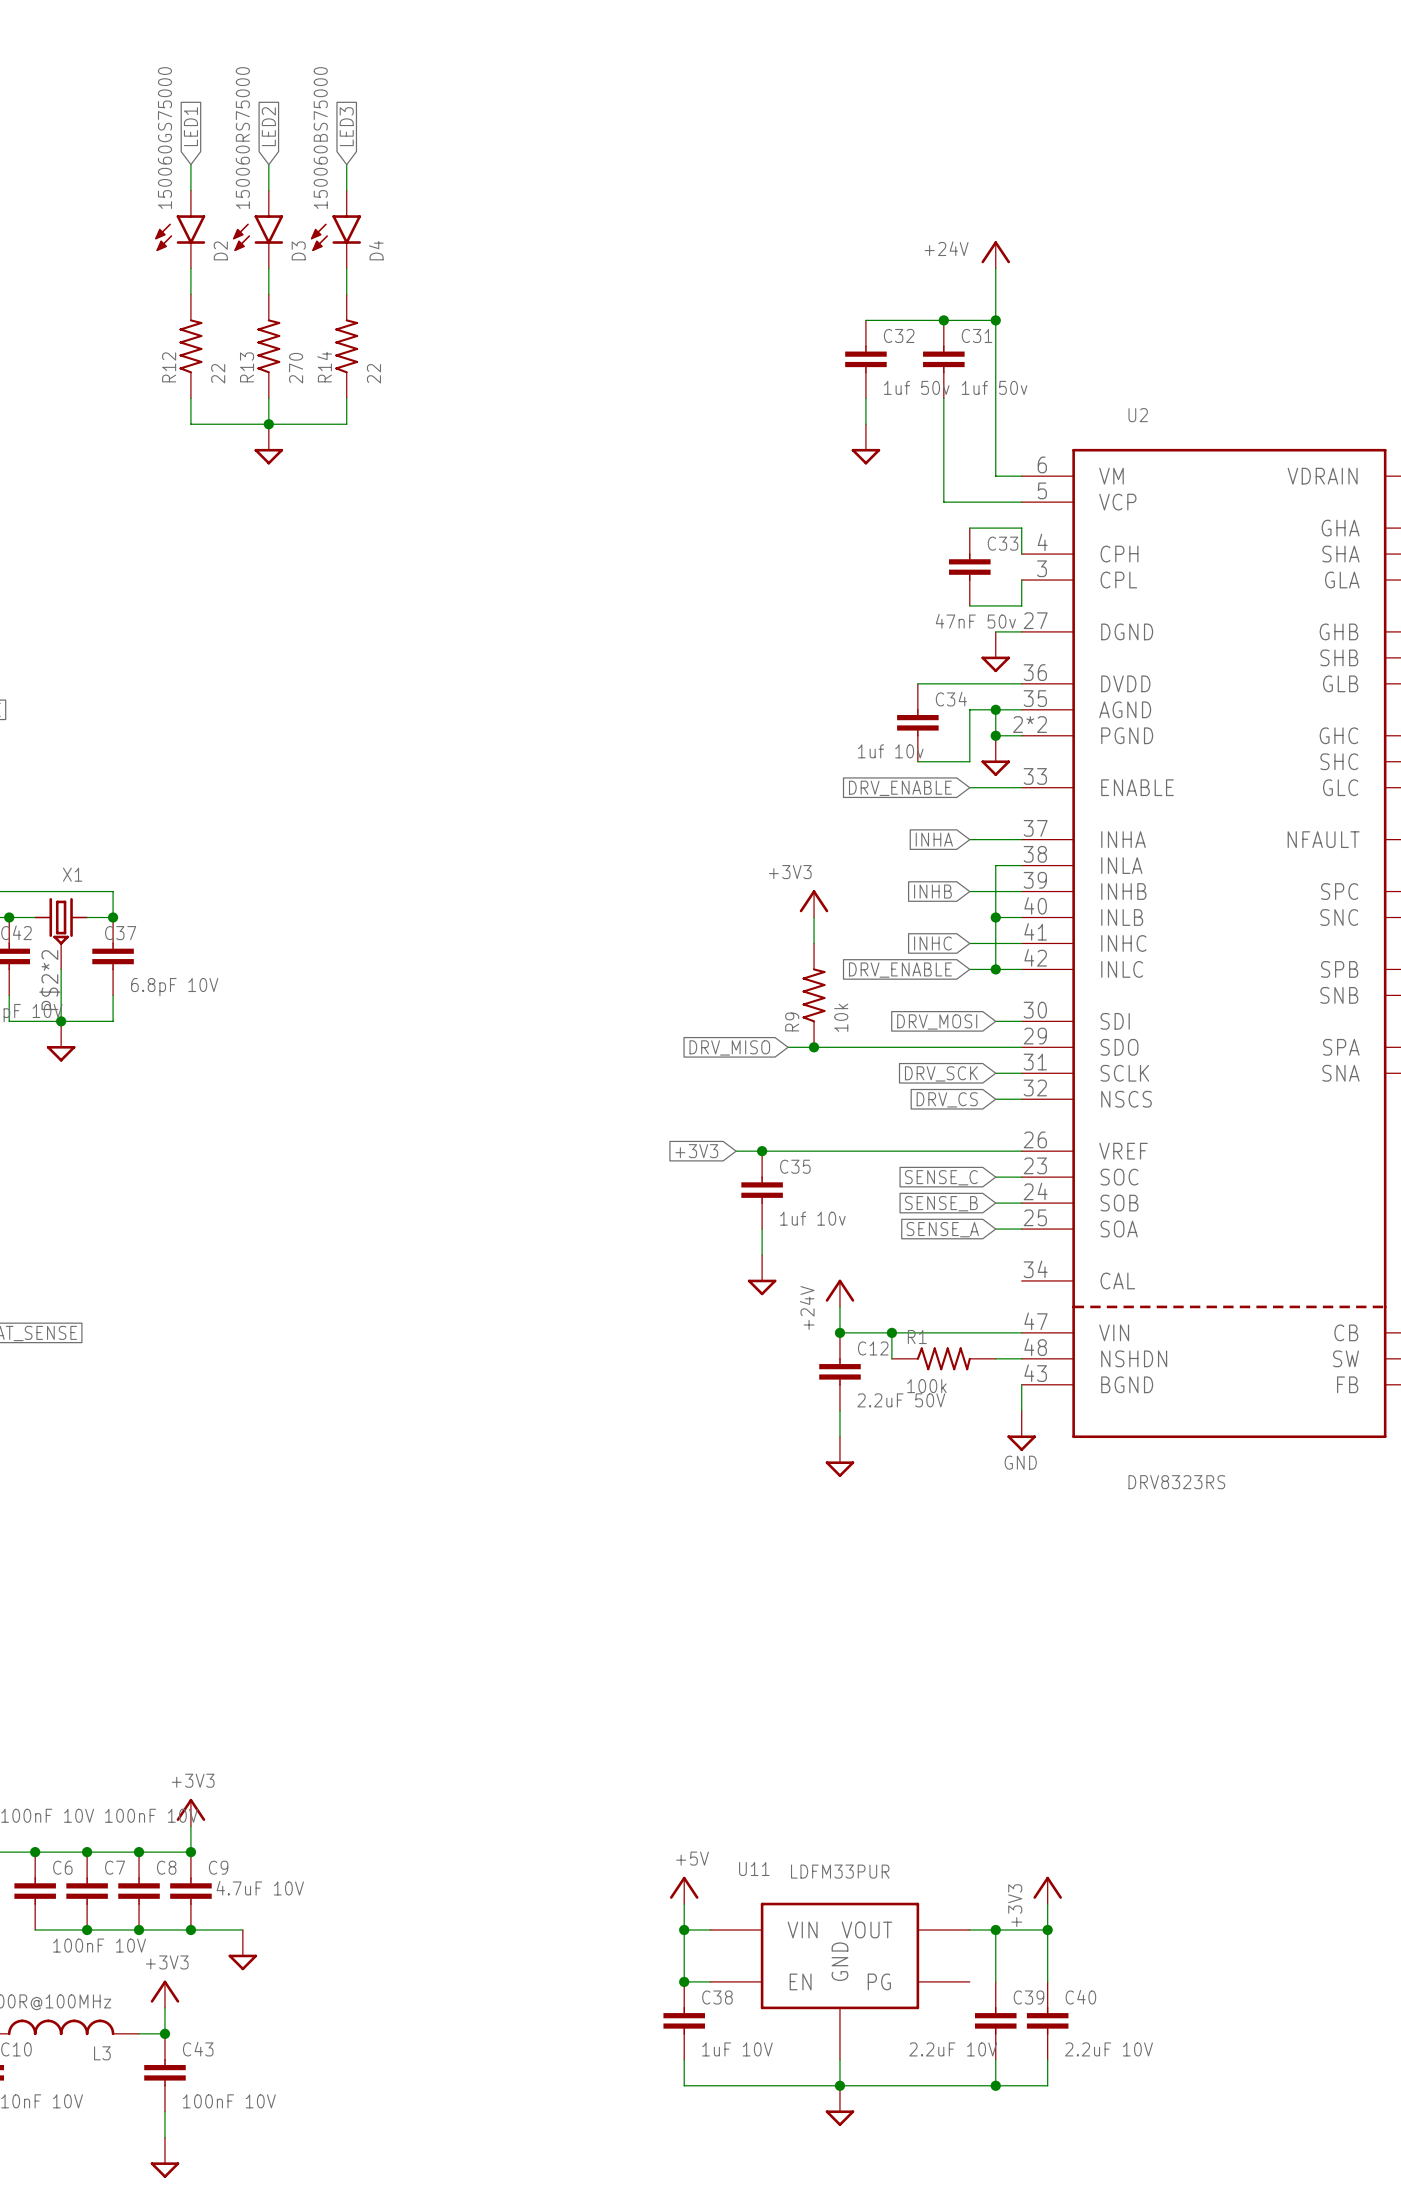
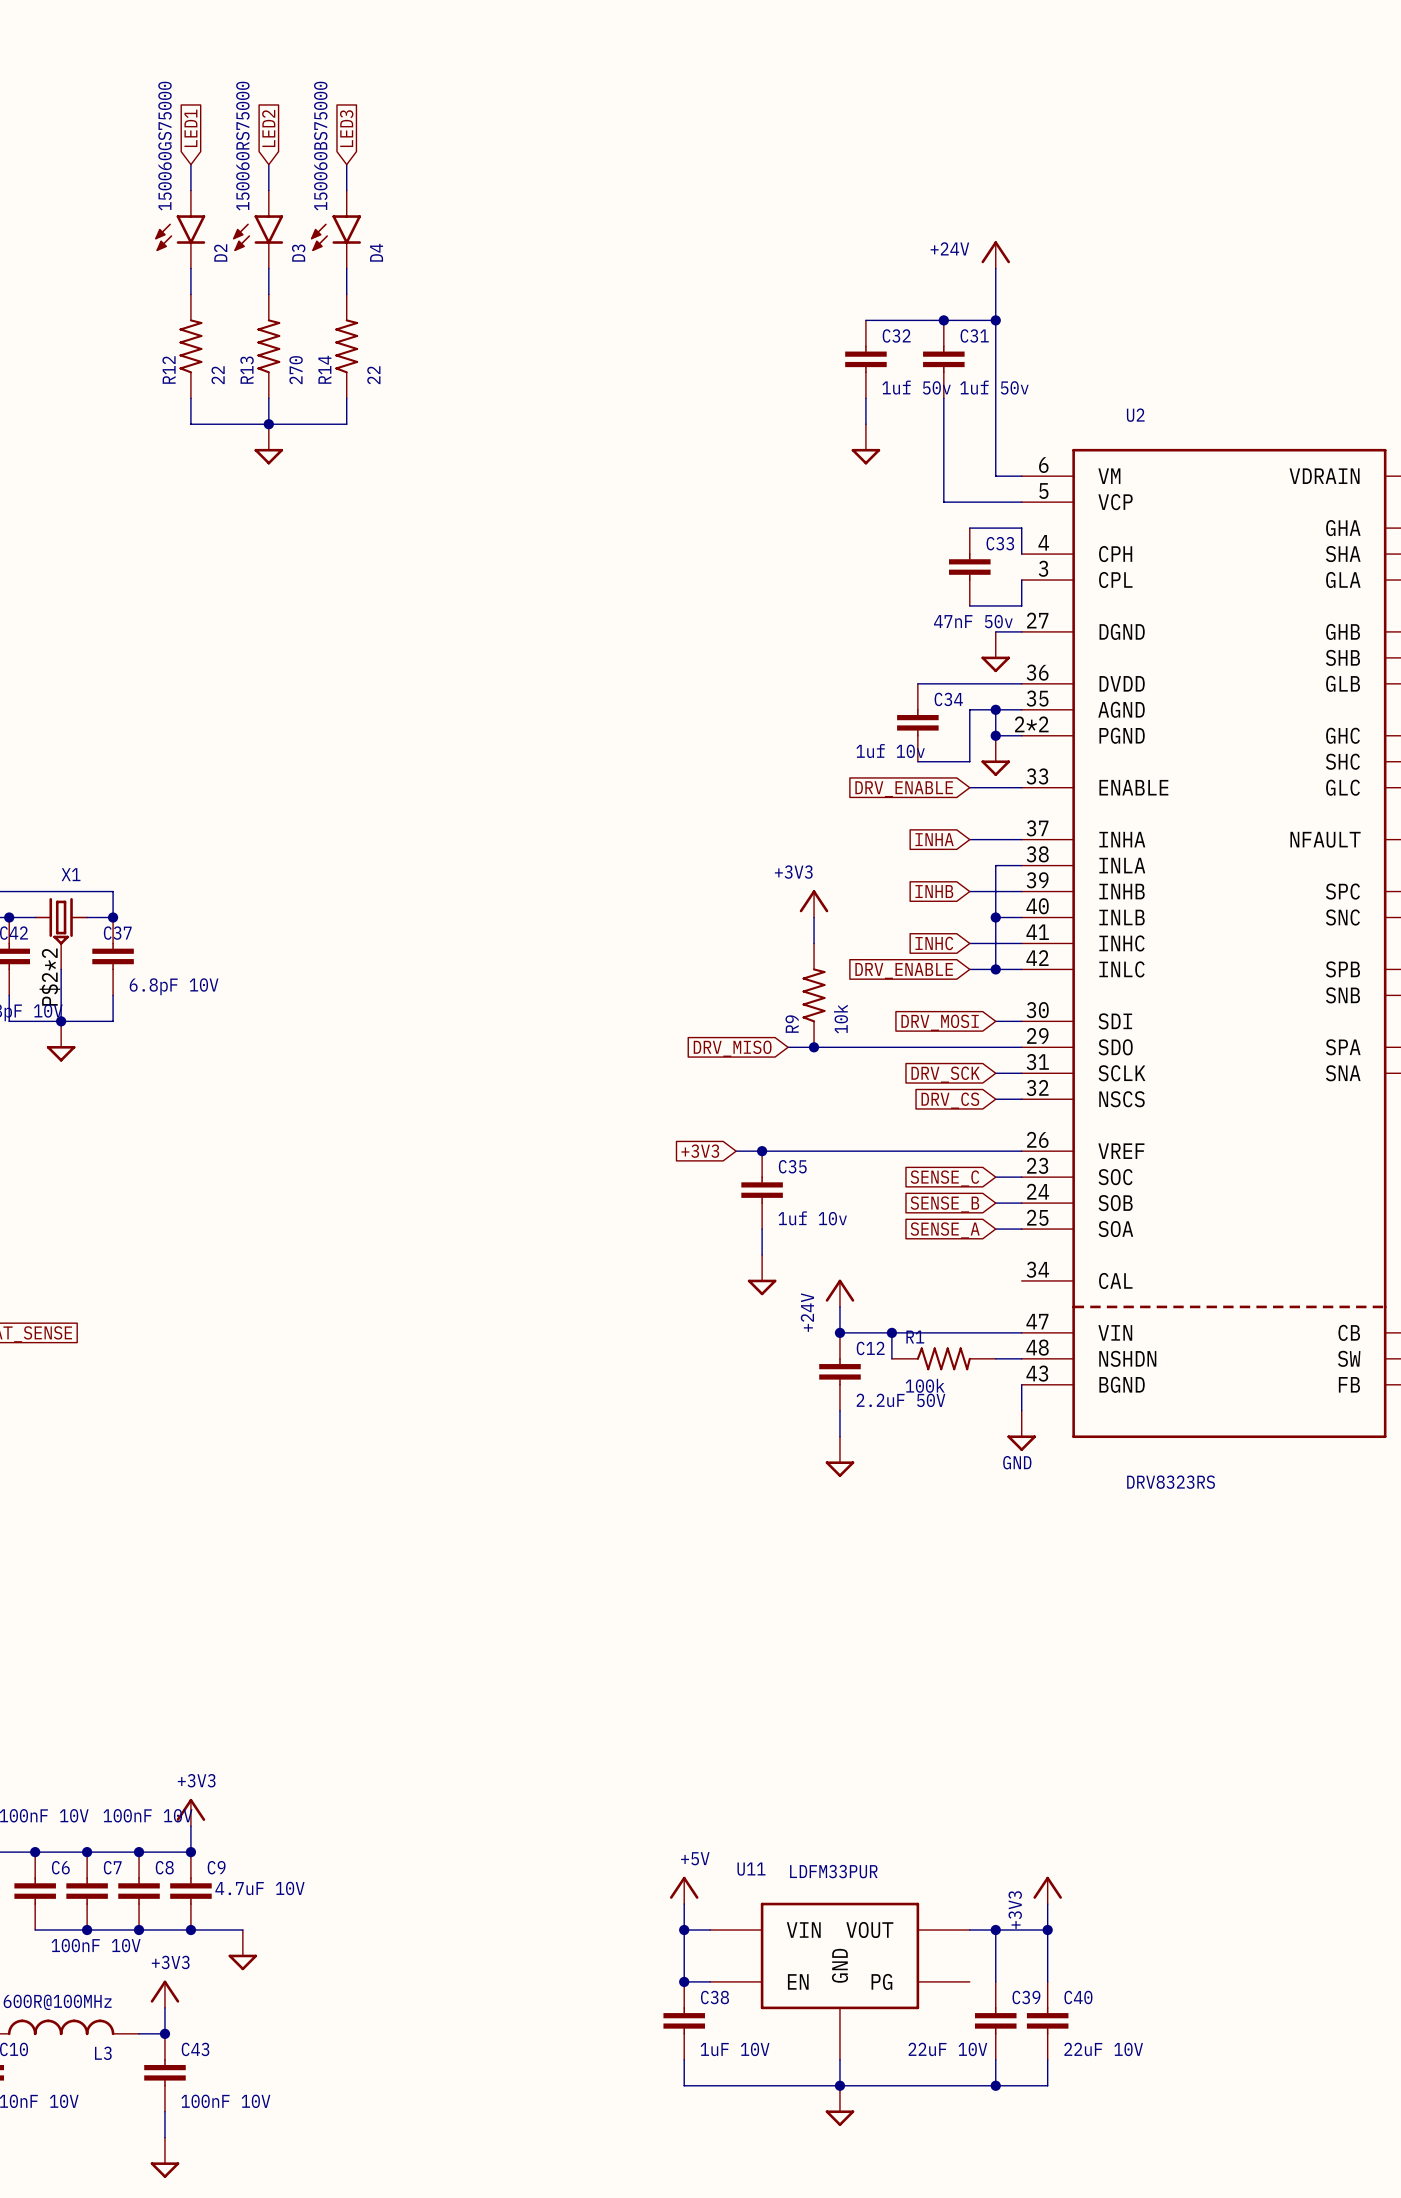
C39 value: 2.2uF 10V (953, 2049) -> 22uF 10V (947, 2049)
C40 value: 2.2uF 10V (1108, 2049) -> 22uF 10V (1103, 2049)

